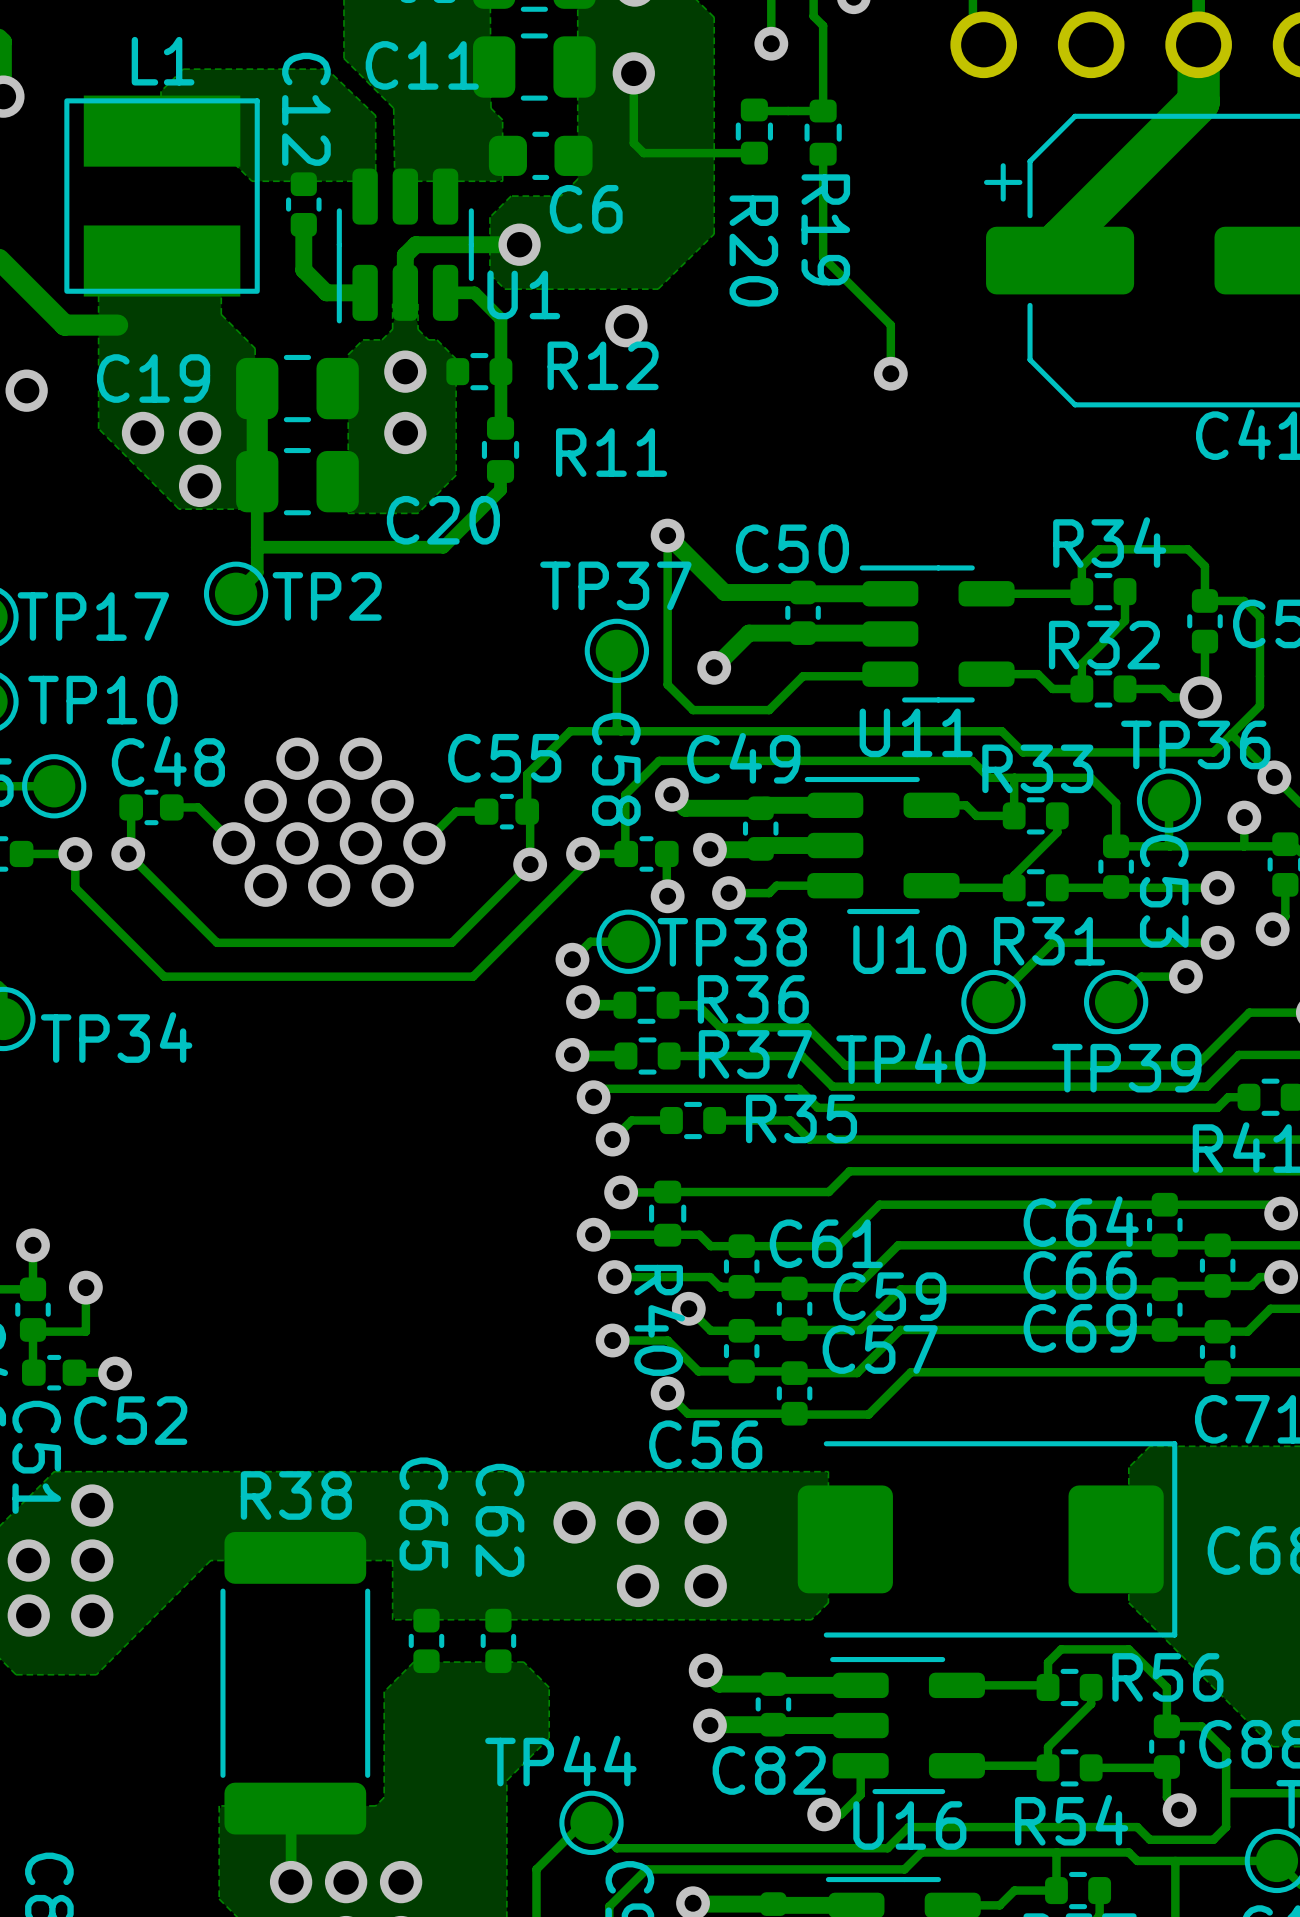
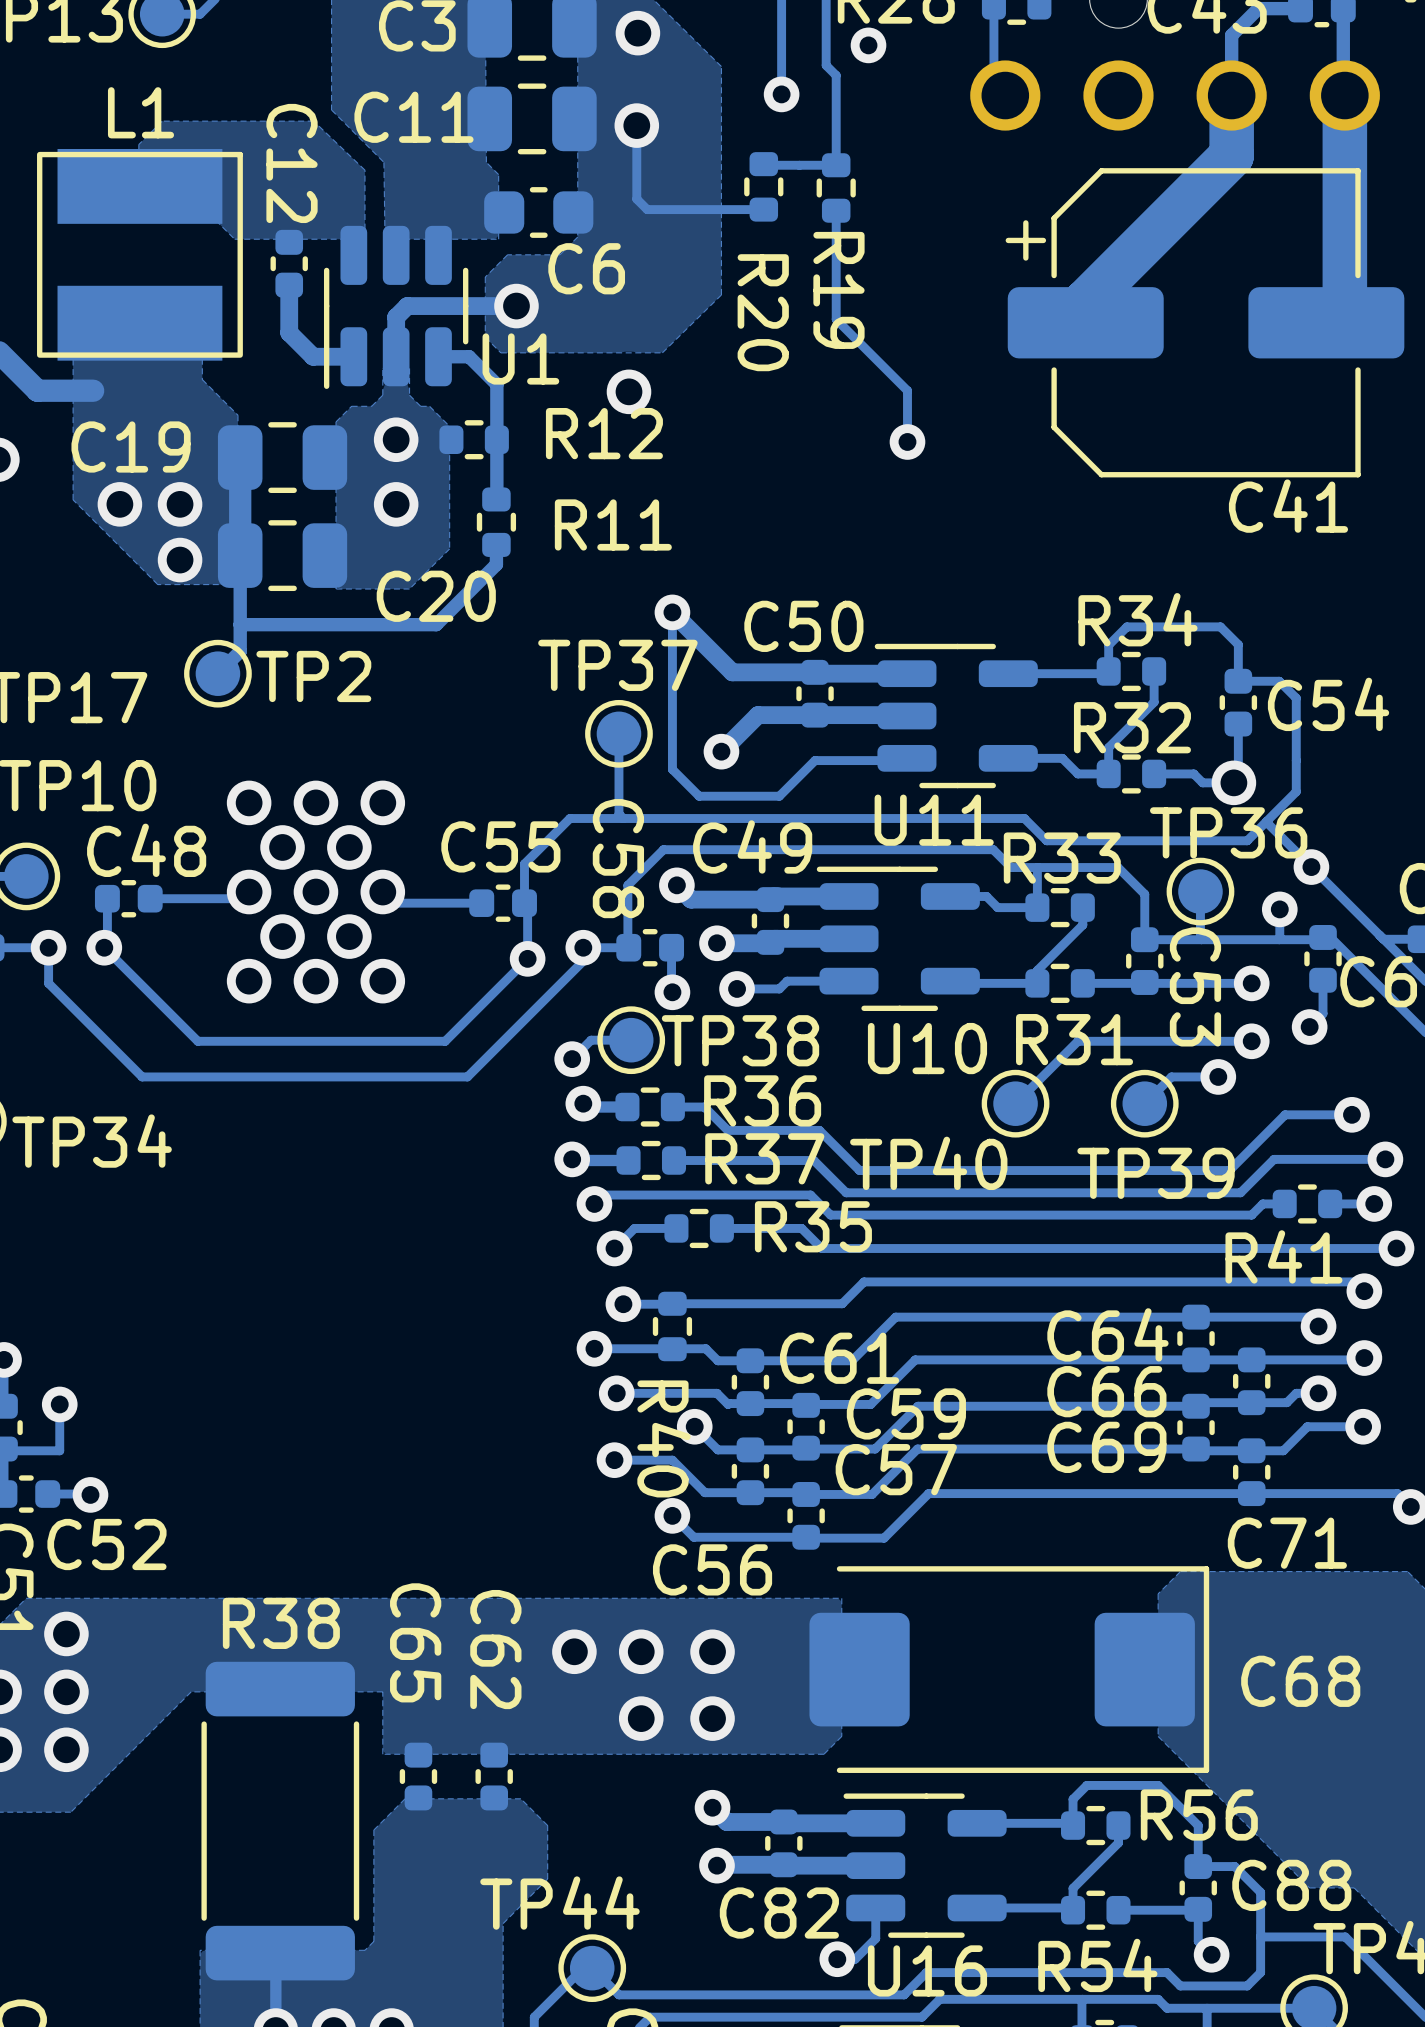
via: none -> (249, 802)
via: none -> (315, 802)
via: none -> (382, 802)
track: (198, 807) (233, 843) -> (177, 898) (242, 898) (249, 892)
track: (456, 811) (424, 843) -> (449, 903) (393, 903) (382, 892)
via: (233, 843) -> none
via: (424, 843) -> none

